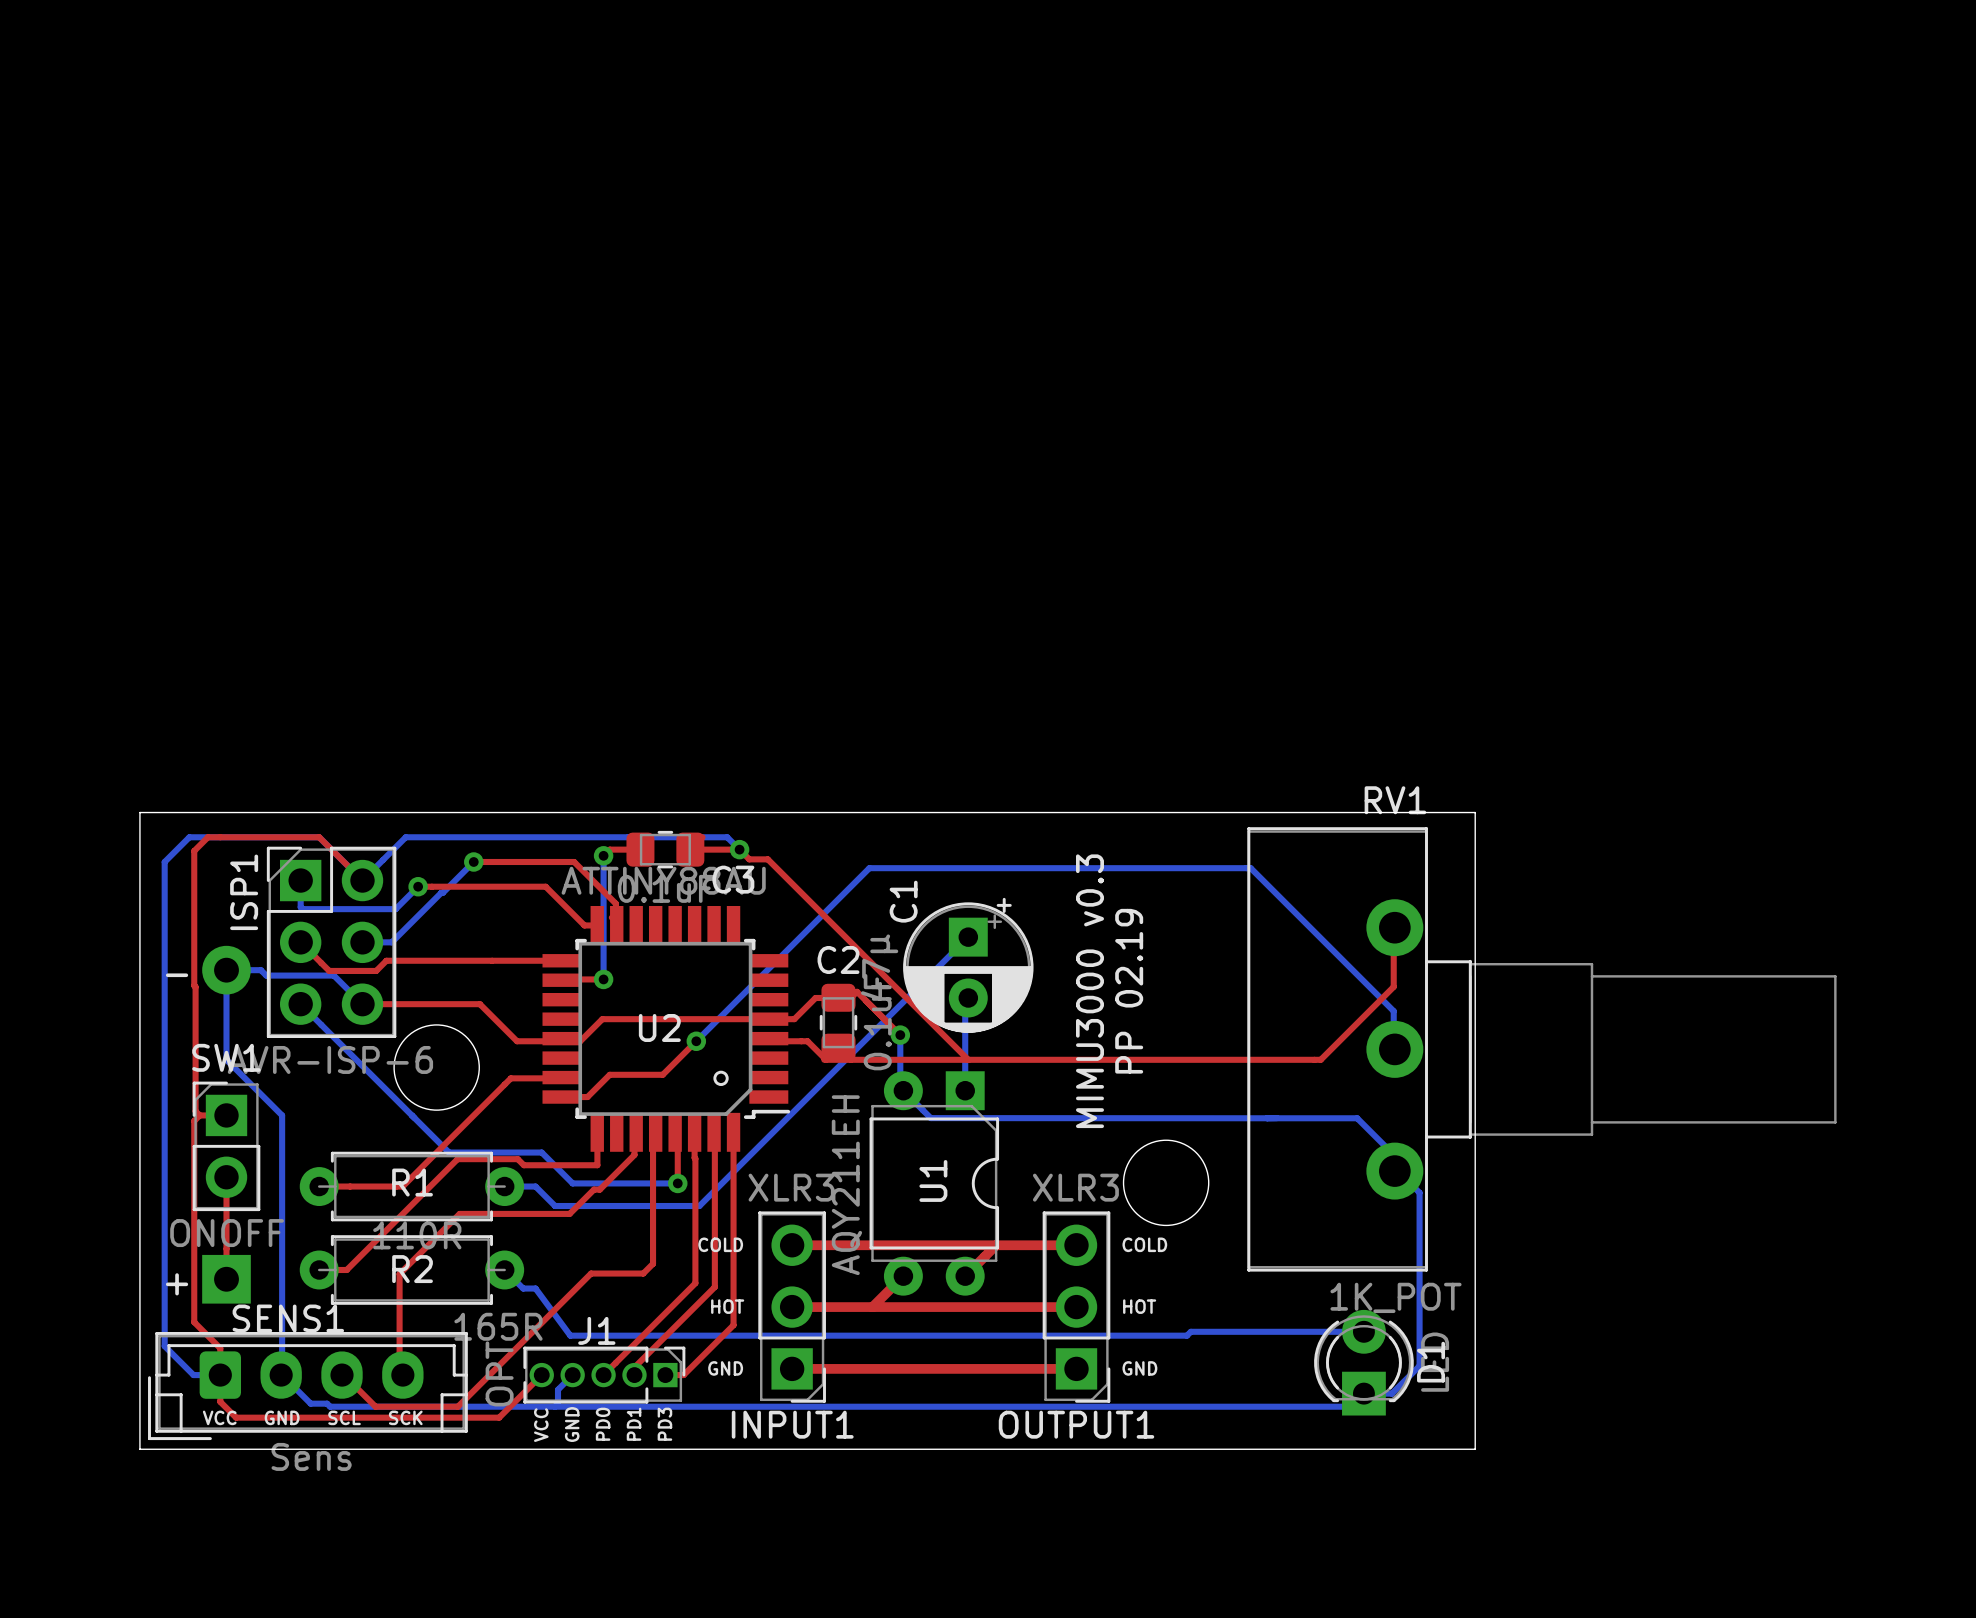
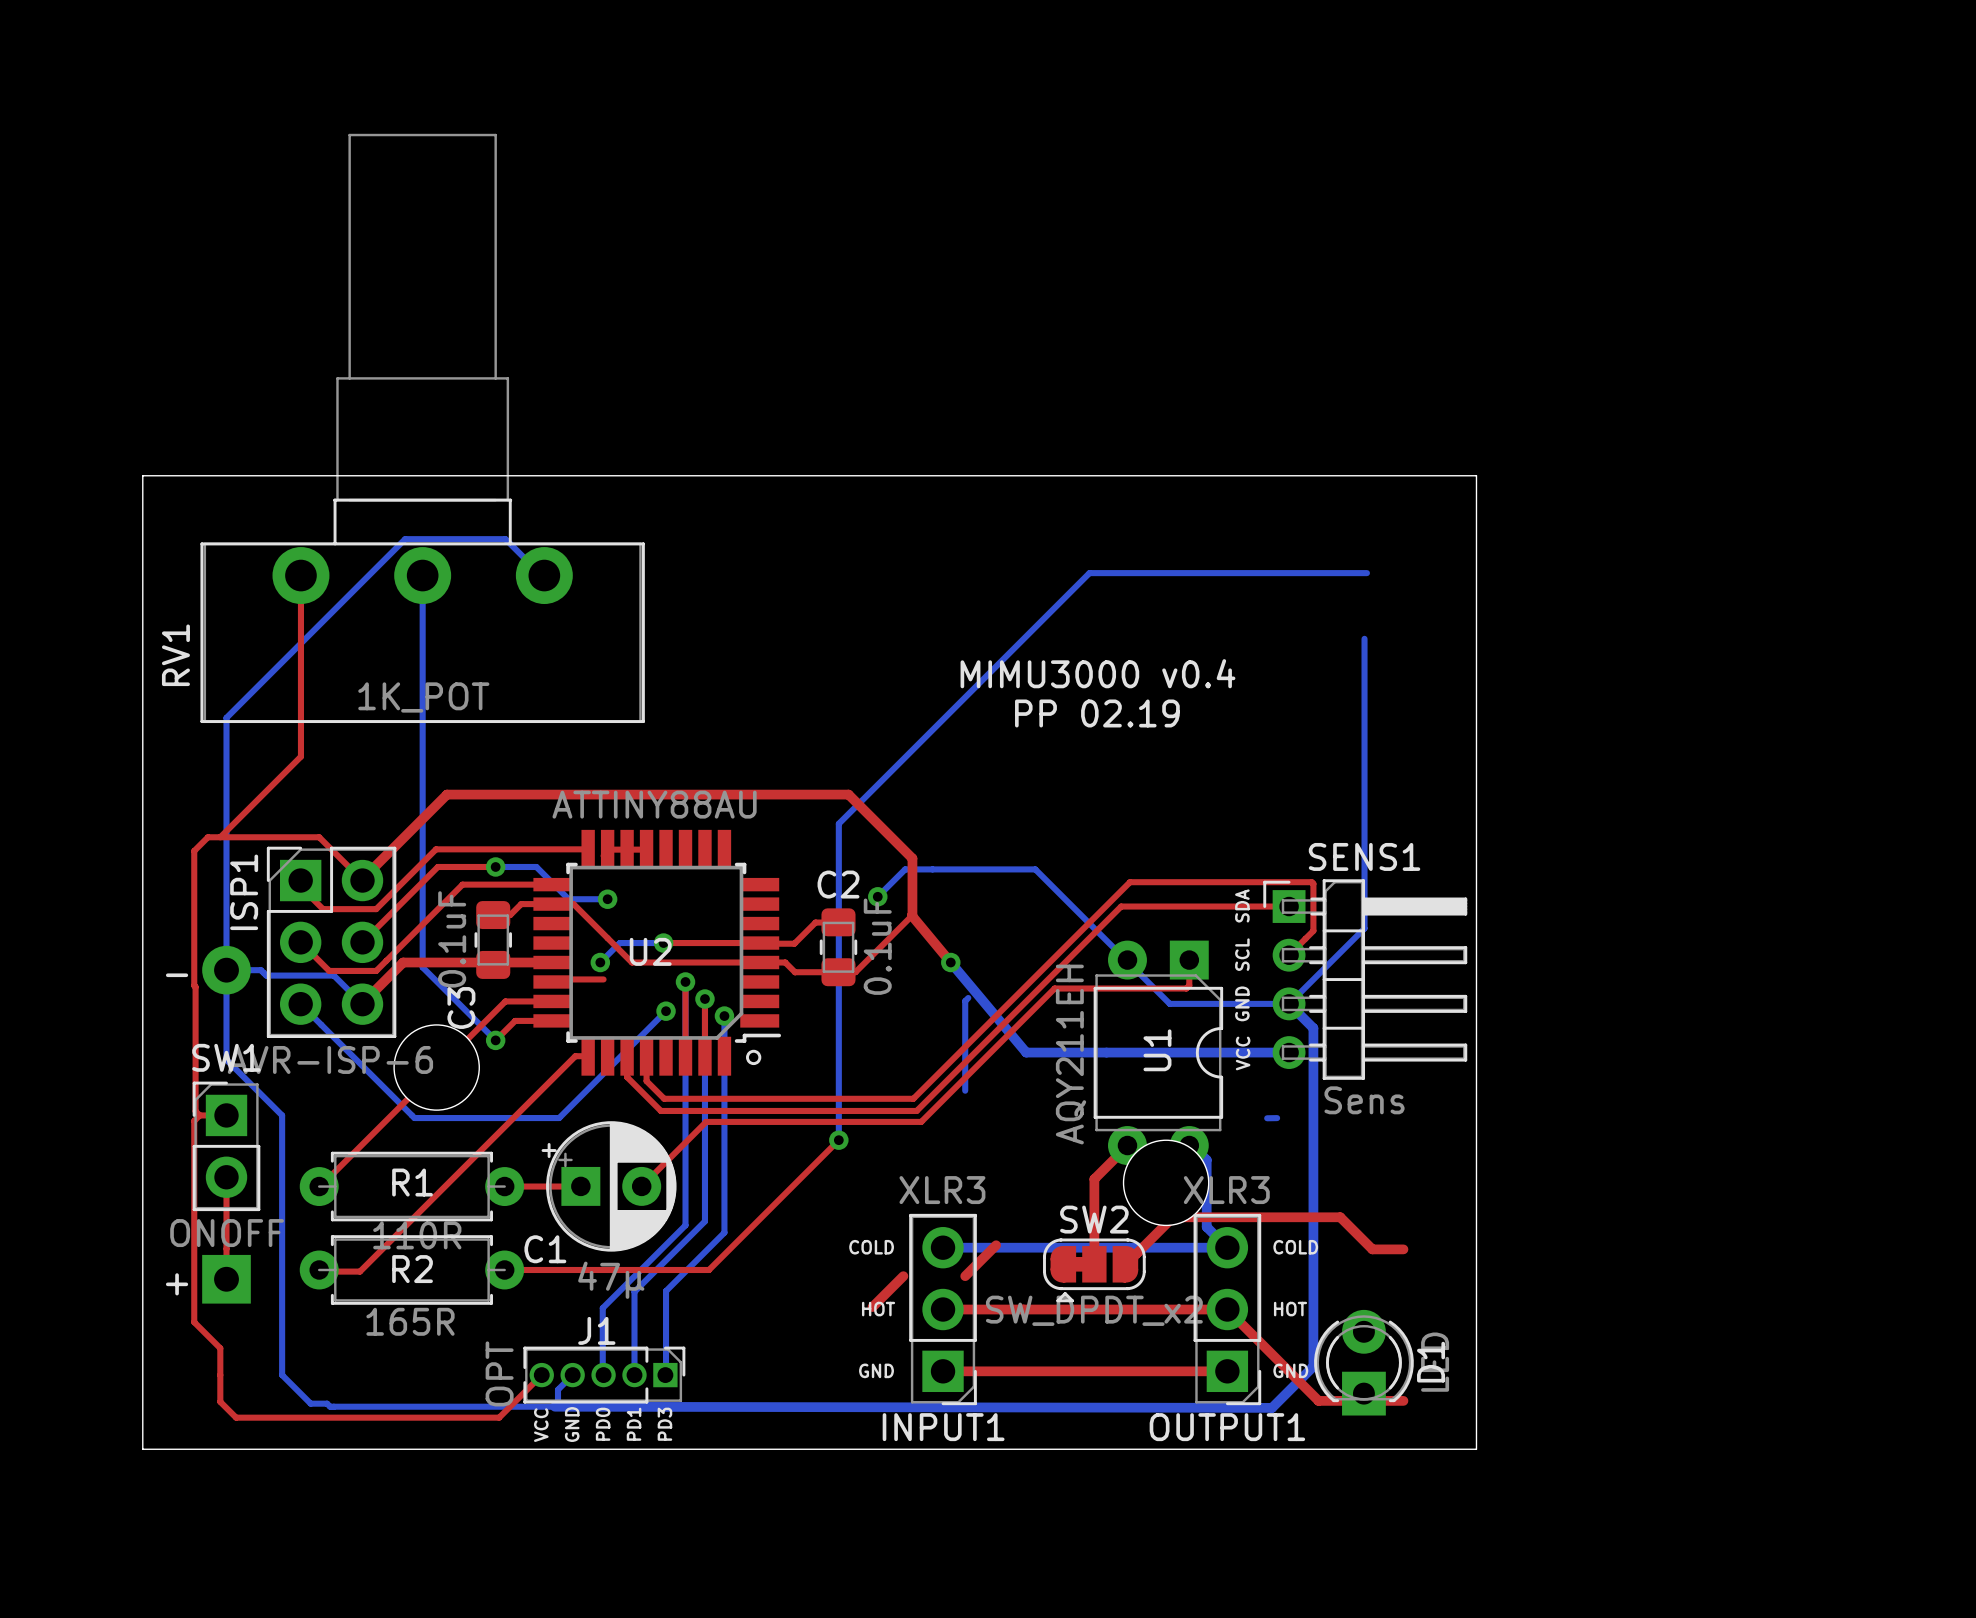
bottom track: none -> (1366, 573) (1089, 573) (838, 823) (838, 1140)
top track: none -> (300, 575) (300, 756) (220, 837)
bottom track: none -> (422, 575) (422, 967) (495, 1040)
bottom track: none -> (544, 577) (505, 539) (405, 539) (226, 717) (226, 970)
bottom track: none -> (1364, 638) (1364, 928) (1289, 1003)
text: none -> MIMU3000 v0.4 (1097, 673)
RV1 name position: RV1 (1395, 800) -> RV1 (175, 655)
top track: (702, 837) (690, 849) (739, 849) (749, 859) (767, 859) (968, 1059) -> none
top track: none -> (588, 849) (436, 849) (376, 909) (323, 909) (300, 887)
C3 rotation: 0° (665, 849) -> 90° clockwise (493, 939)
C3 position: (665, 849) -> (493, 939)
bottom track: (739, 849) (727, 837) (405, 837) (362, 880) (319, 837) (189, 837) (164, 861) (164, 1346) (193, 1375) (220, 1375) -> none
via: (739, 849) -> none
bottom track: (603, 855) (603, 979) -> none
via: (603, 855) -> none
top track: (473, 861) (574, 861) (615, 903) (615, 917) (611, 917) -> none
bottom track: (473, 861) (391, 942) (362, 942) -> none
via position: (473, 861) -> (495, 866)
top track: none -> (495, 866) (437, 866) (362, 942)
bottom track: none -> (495, 866) (536, 866) (568, 899) (607, 899)
top track: none -> (361, 879) (447, 794) (848, 794) (912, 858) (911, 915) (950, 962)
bottom track: (300, 880) (300, 907) (302, 909) (395, 909) (418, 886) -> none
top track: (418, 886) (545, 886) (584, 925) (597, 925) -> none
via: (418, 886) -> none
bottom track: none -> (877, 896) (905, 869) (1035, 869) (1169, 1003) (1289, 1003)
via: none -> (877, 896)
via: none -> (607, 899)
top track: none -> (551, 904) (521, 904) (510, 915) (493, 915)
top track: none -> (554, 904) (573, 904) (631, 962) (785, 962) (795, 972) (855, 972) (911, 915)
text: none -> SDA (1242, 905)
top track: none -> (1289, 906) (1121, 906) (916, 1110) (660, 1110) (627, 1077) (627, 1059)
top track: none -> (850, 922) (815, 922) (794, 943) (768, 943)
top track: (1393, 930) (1393, 986) (1320, 1059) (824, 1059) -> none
bottom track: (968, 937) (699, 1206) (555, 1206) (535, 1186) (504, 1186) -> none
top track: none -> (663, 943) (759, 943)
bottom track: none -> (663, 943) (619, 943) (600, 962)
via: none -> (663, 943)
text: none -> SCL (1242, 954)
top track: none -> (1289, 955) (1313, 930) (1313, 883) (1311, 882) (1130, 882) (913, 1098) (664, 1098) (646, 1081) (646, 1056)
top track: (386, 960) (561, 960) -> (386, 960) (462, 884) (551, 884)
top track: none -> (1189, 960) (1189, 985) (1186, 988) (1054, 988) (921, 1121) (706, 1121) (641, 1186)
bottom track: none -> (950, 962) (1026, 1052) (1289, 1052)
via: none -> (950, 962)
C1 rotation: 0° (968, 965) -> 90° counterclockwise (609, 1186)
C1 position: (968, 965) -> (609, 1186)
via position: (603, 979) -> (600, 962)
top track: none -> (685, 981) (685, 1056)
bottom track: none -> (685, 981) (685, 1225) (602, 1308) (602, 1376)
via: none -> (685, 981)
text: MIMU3000 v0.3 (1089, 991) -> none
text rotation: 0° (1129, 991) -> 90° clockwise (1097, 713)
text position: PP 02.19 (1129, 991) -> PP 02.19 (1097, 713)
top track: (850, 997) (815, 997) (794, 1019) (602, 1019) (580, 1041) (517, 1041) (479, 1004) (362, 1004) -> (552, 962) (403, 962) (361, 1003)
top track: (851, 997) (857, 991) (900, 1035) -> none
top track: none -> (704, 999) (704, 1054)
bottom track: none -> (704, 999) (704, 1221) (634, 1291) (634, 1375)
via: none -> (704, 999)
top track: none -> (552, 1001) (505, 1001) (320, 1186)
text: none -> GND (1242, 1003)
via: none -> (666, 1011)
bottom track: none -> (724, 1016) (724, 1232) (666, 1291) (666, 1376)
via: none -> (724, 1016)
top track: none -> (552, 1020) (515, 1020) (495, 1040)
C2 position: (838, 1022) -> (838, 947)
U2 position: (666, 1028) -> (657, 952)
bottom track: (900, 1035) (900, 1087) (930, 1118) (1357, 1118) (1398, 1159) (1398, 1171) (1419, 1192) (1419, 1365) (1391, 1393) (1363, 1393) (1350, 1406) (554, 1406) -> (1289, 1003) (1313, 1028) (1313, 1366) (1272, 1407) (554, 1406)
via: (900, 1035) -> none
via: none -> (495, 1040)
top track: (696, 1041) (662, 1074) (609, 1074) (587, 1097) (561, 1097) -> none
bottom track: (696, 1041) (869, 868) (1250, 868) (1393, 1011) (1393, 1047) -> none
via: (696, 1041) -> none
top track: (764, 1041) (807, 1041) (826, 1059) -> none
RV1 rotation: 0° (1541, 1049) -> 90° counterclockwise (422, 428)
RV1 position: (1541, 1049) -> (422, 428)
text: none -> VCC (1243, 1053)
top track: none -> (588, 1056) (575, 1056) (359, 1271) (318, 1271)
top track: (554, 1078) (510, 1078) (402, 1186) (322, 1186) -> none
drawing position: (721, 1078) -> (753, 1057)
bottom track: (414, 1118) (449, 1152) (541, 1152) (572, 1183) (677, 1183) -> (414, 1118) (559, 1118) (666, 1011)
top track: (694, 1132) (695, 1283) (603, 1375) -> none
top track: (733, 1132) (733, 1325) (683, 1375) (665, 1375) -> none
top track: (597, 1133) (597, 1165) (523, 1165) (517, 1159) (457, 1159) (346, 1269) (325, 1269) -> none
top track: (634, 1133) (634, 1154) (599, 1189) (593, 1189) (569, 1213) (459, 1213) (399, 1274) (399, 1375) -> none
top track: (653, 1133) (653, 1263) (643, 1273) (591, 1273) (457, 1406) (375, 1406) (343, 1375) -> none
top track: (677, 1140) (677, 1183) -> none
top track: (714, 1140) (714, 1287) (634, 1367) (634, 1375) -> none
top track: none -> (838, 1140) (709, 1269) (504, 1269)
via: none -> (838, 1140)
top track: none -> (1128, 1145) (1094, 1179) (1094, 1264)
bottom track: none -> (1191, 1145) (1206, 1160) (1206, 1227) (1227, 1247) (943, 1247)
via: (677, 1183) -> none
U1 position: (934, 1183) -> (1158, 1052)
top track: none -> (504, 1186) (580, 1186)
text: COLD (720, 1244) -> none
text: COLD (1144, 1244) -> none
top track: (792, 1245) (1076, 1245) -> none
text: none -> COLD (871, 1247)
text: none -> COLD (1295, 1247)
top track: none -> (1403, 1249) (1372, 1249) (1340, 1217) (1173, 1217) (1126, 1264) (1123, 1264)
bottom track: (504, 1269) (523, 1288) (535, 1288) (570, 1335) (1186, 1335) (1190, 1331) (1363, 1331) -> none
SW2: none -> SW_DPDT_x2 (1094, 1270)
RV1 value position: 1K_POT (1396, 1297) -> 1K_POT (423, 697)
text: HOT (727, 1306) -> none
text: HOT (1139, 1306) -> none
top track: (792, 1307) (1076, 1307) -> (943, 1309) (1227, 1309)
INPUT1 position: (792, 1307) -> (943, 1309)
OUTPUT1 position: (1076, 1307) -> (1227, 1309)
text: none -> HOT (878, 1309)
text: none -> HOT (1290, 1309)
top track: none -> (1228, 1310) (1318, 1400) (1403, 1400)
SENS1 name position: SENS1 (288, 1318) -> SENS1 (1364, 856)
R2 value position: 165R (498, 1326) -> 165R (410, 1321)
SENS1 footprint: [148, 1332, 468, 1441] -> [1263, 879, 1468, 1080]
text: GND (725, 1368) -> none
top track: (792, 1368) (1076, 1368) -> (943, 1371) (1227, 1371)
text: GND (1139, 1368) -> none
text: none -> GND (876, 1370)
text: none -> GND (1290, 1370)
text: VCC (219, 1417) -> none
text: GND (282, 1417) -> none
text: SCL (344, 1417) -> none
text: SCK (405, 1417) -> none
board edge: (142, 1449) (139, 1449) (139, 812) (1475, 812) (1475, 1449) -> (142, 1449) (142, 475) (1476, 475) (1475, 1449)
SENS1 value position: Sens (311, 1456) -> Sens (1364, 1100)

